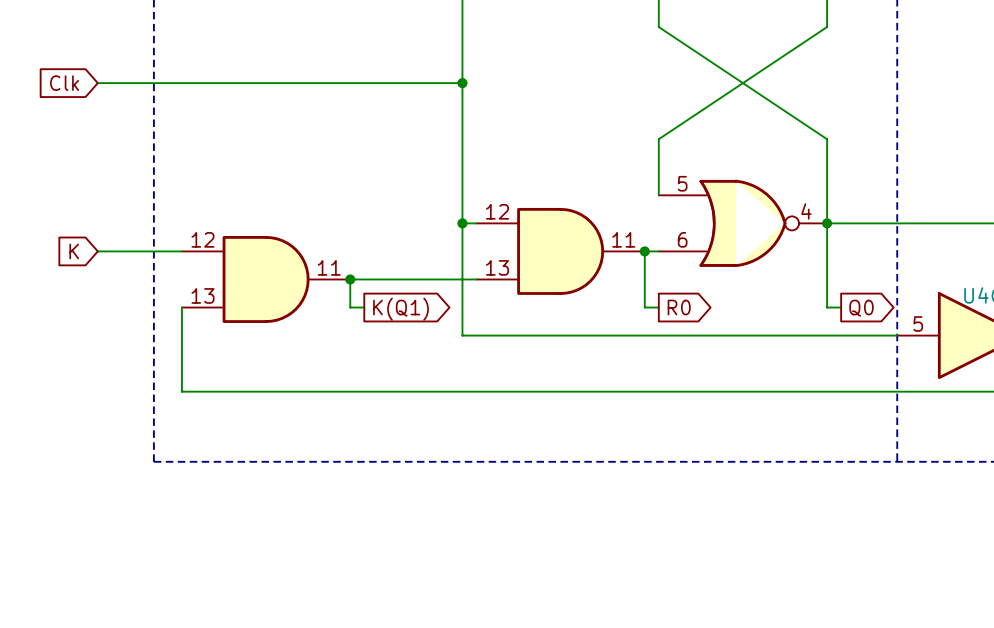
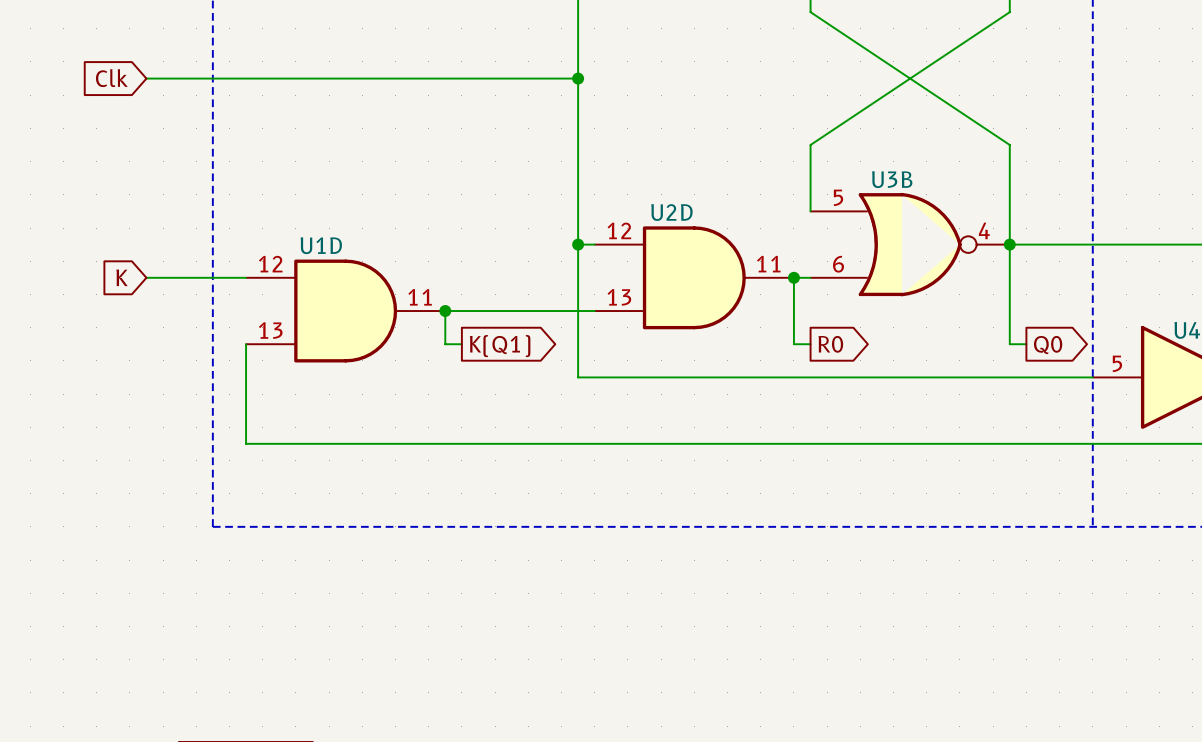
U3B name: none -> U3B (892, 179)
U2D name: none -> U2D (671, 212)
U1D name: none -> U1D (321, 245)

